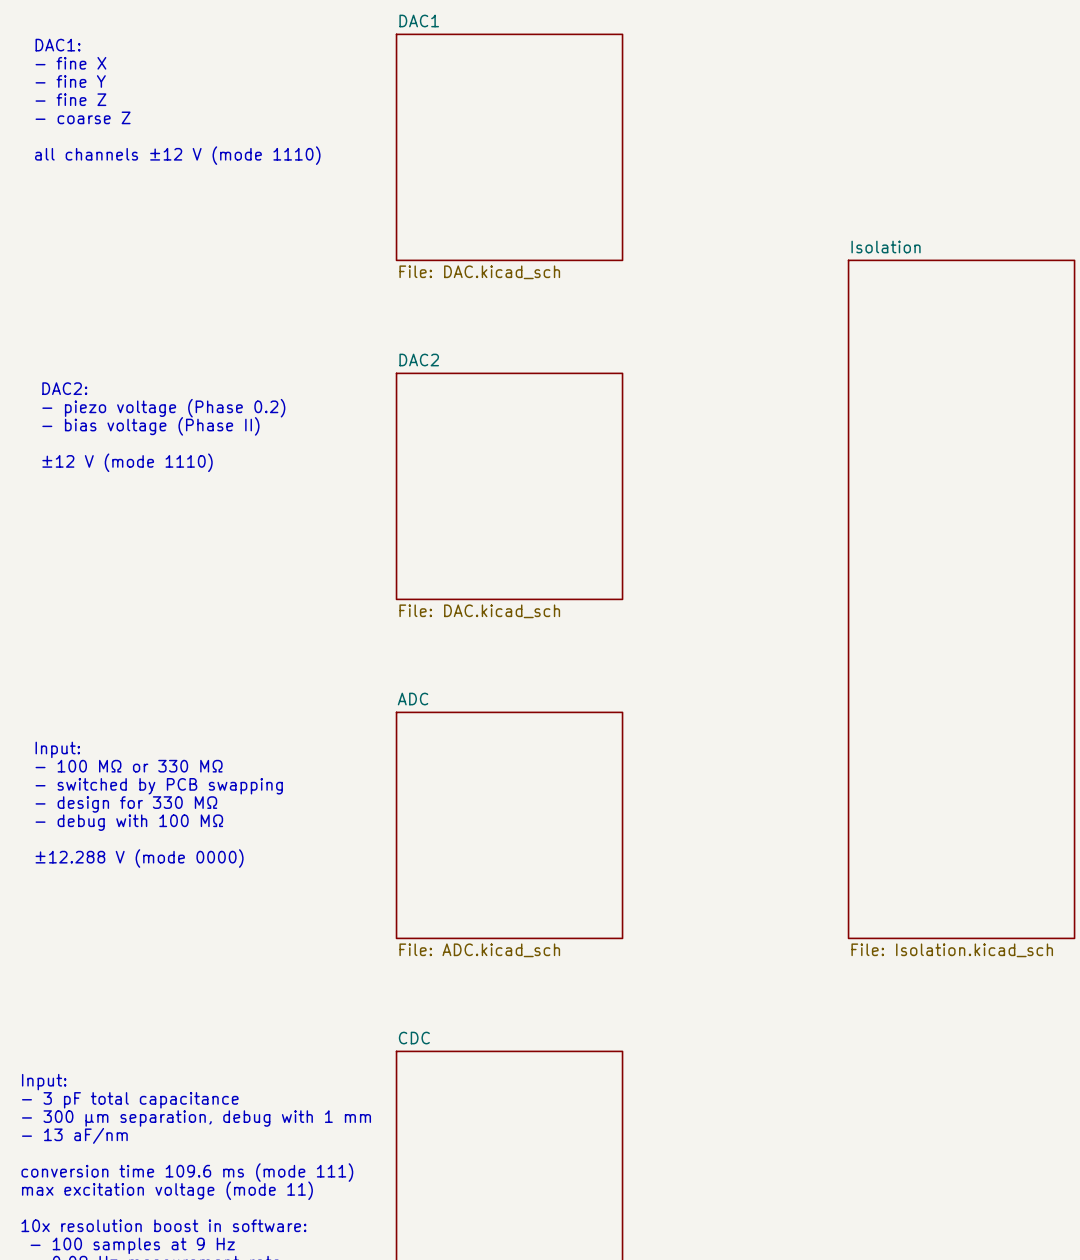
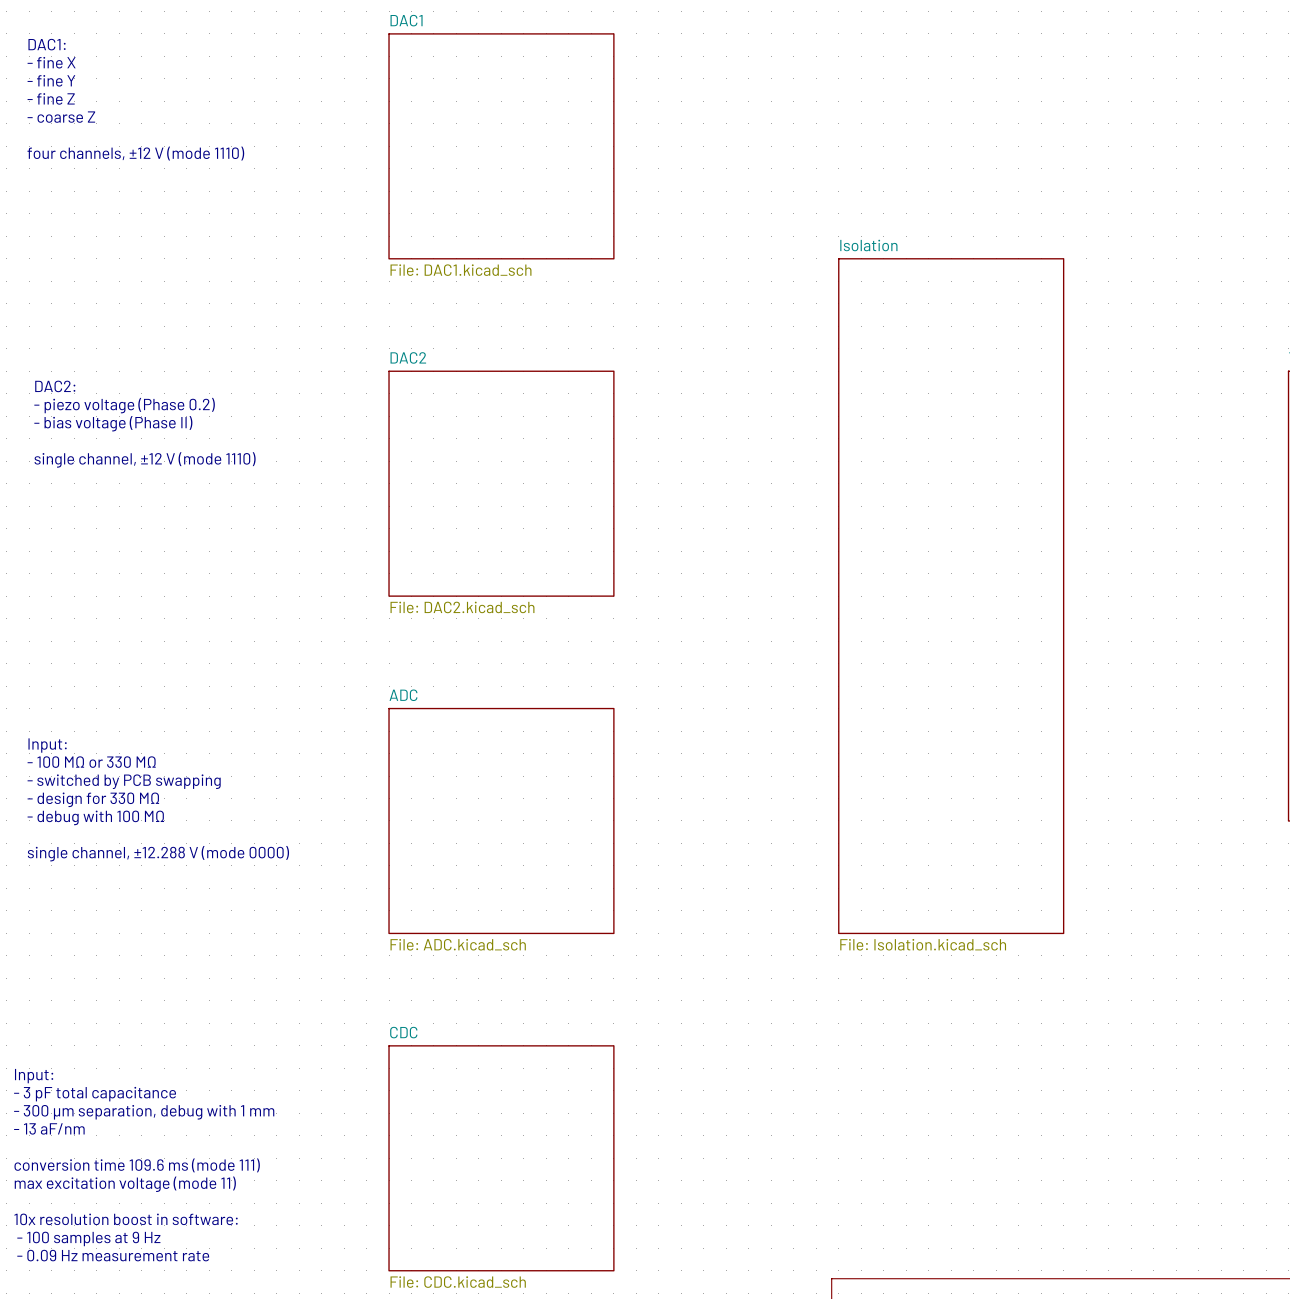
text: all channels ±12 V (mode 1110) (177, 155) -> four channels, ±12 V (mode 1110) (135, 153)
sheet DAC1 value: File: DAC.kicad_sch (479, 272) -> File: DAC1.kicad_sch (460, 270)
text: ±12 V (mode 1110) (127, 462) -> single channel, ±12 V (mode 1110) (145, 459)
sheet DAC2 value: File: DAC.kicad_sch (479, 611) -> File: DAC2.kicad_sch (462, 607)
text: ±12.288 V (mode 0000) (139, 858) -> single channel, ±12.288 V (mode 0000) (158, 853)

